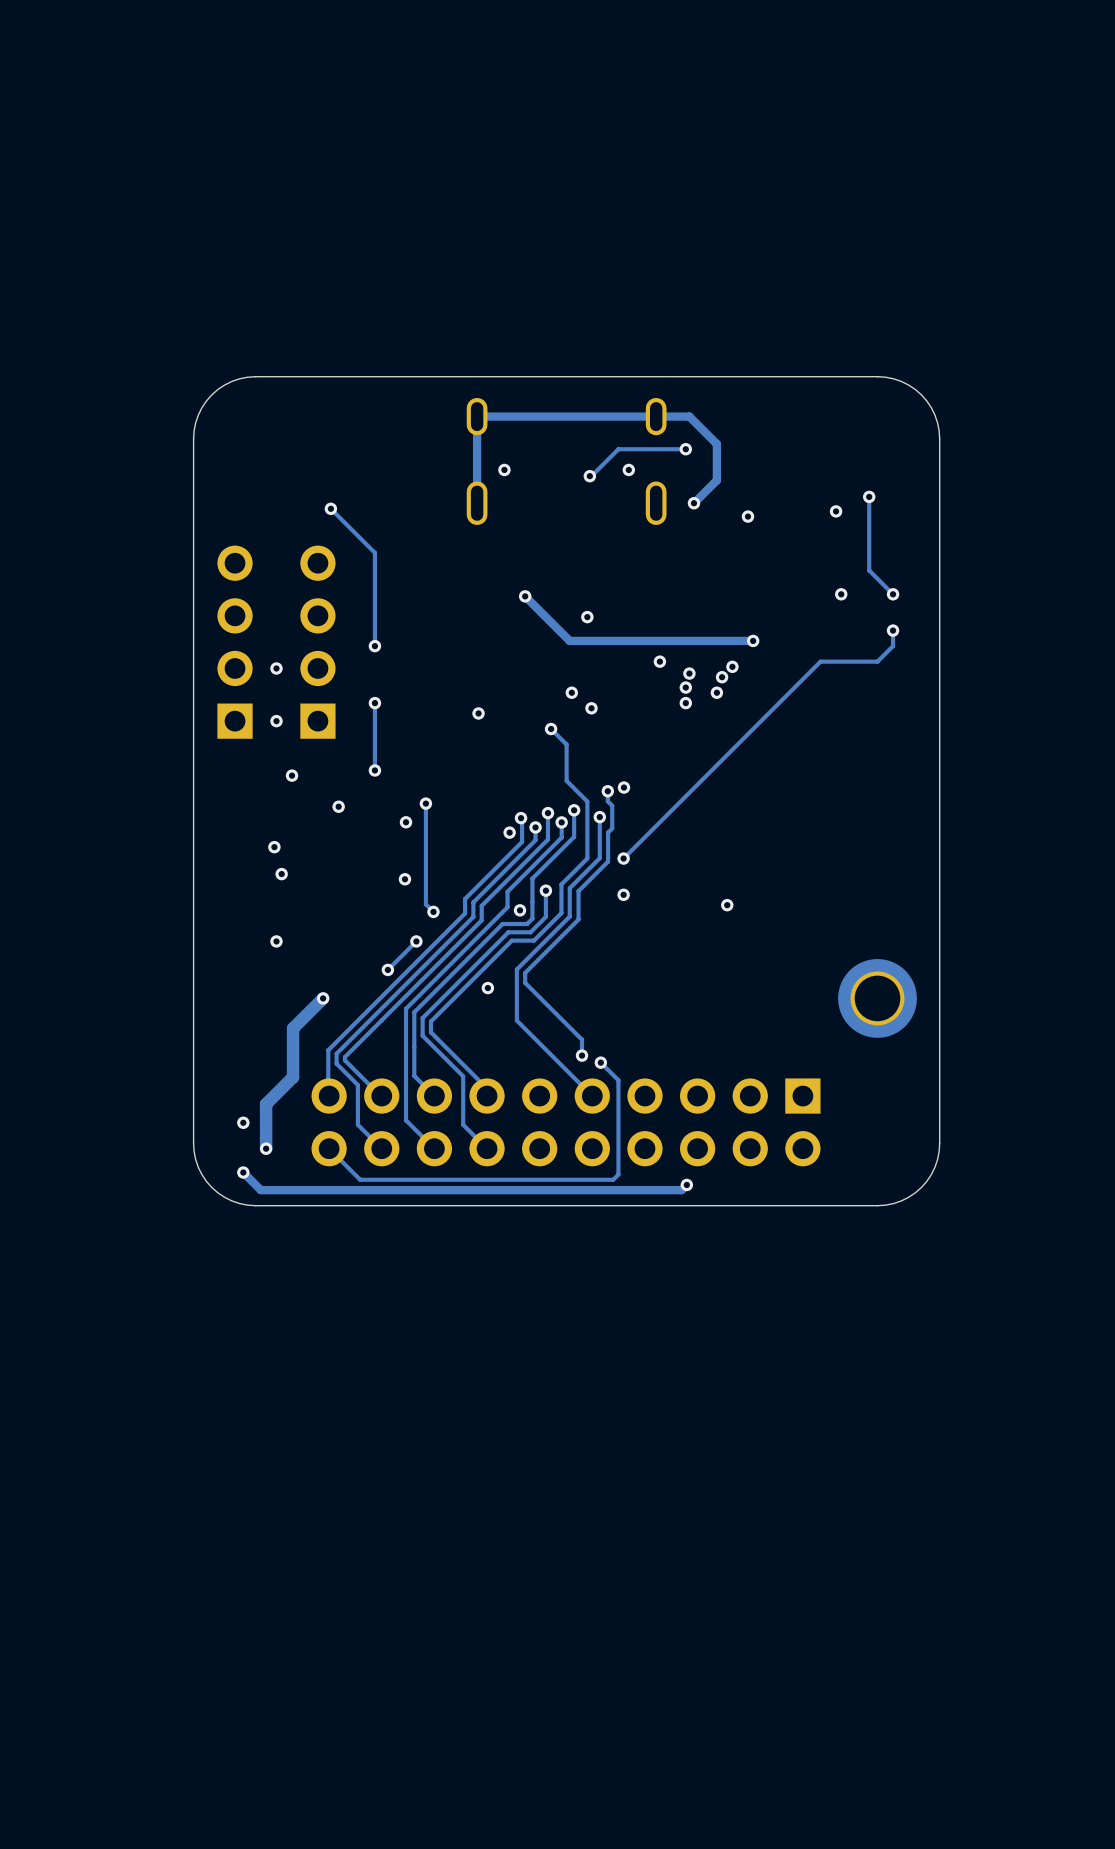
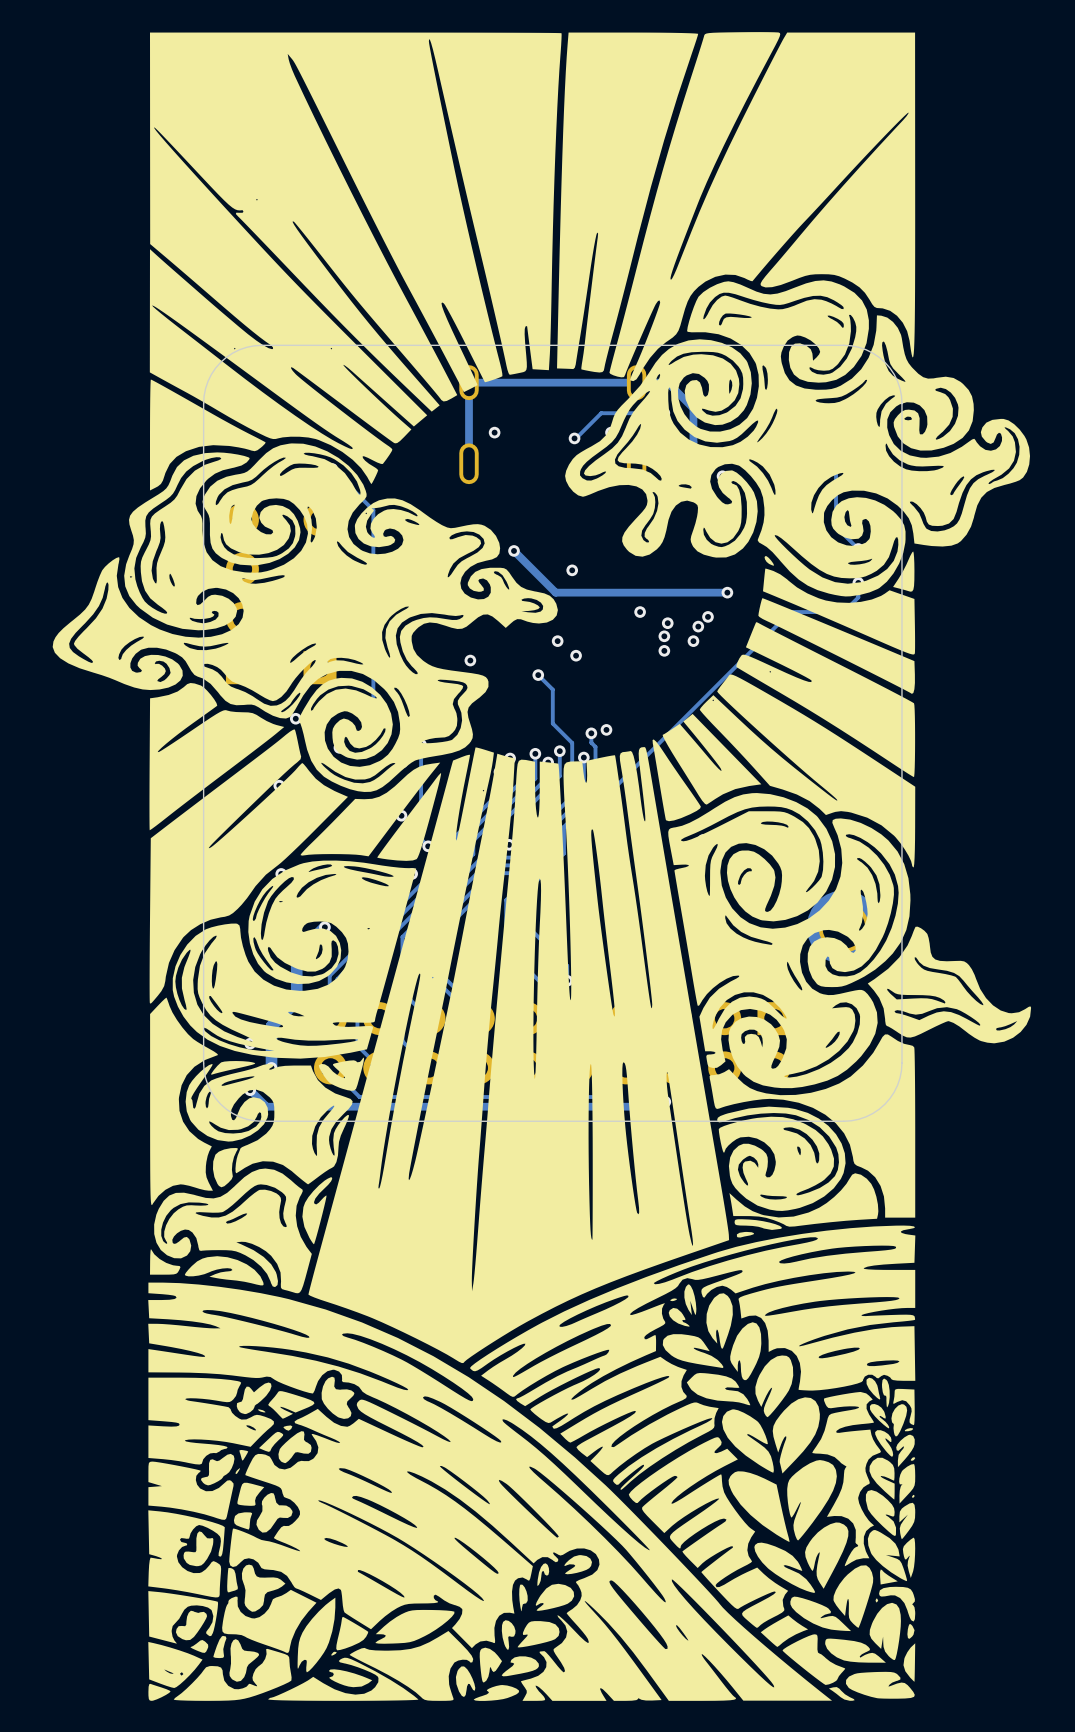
drawing: none -> [52, 32, 1032, 1701]

